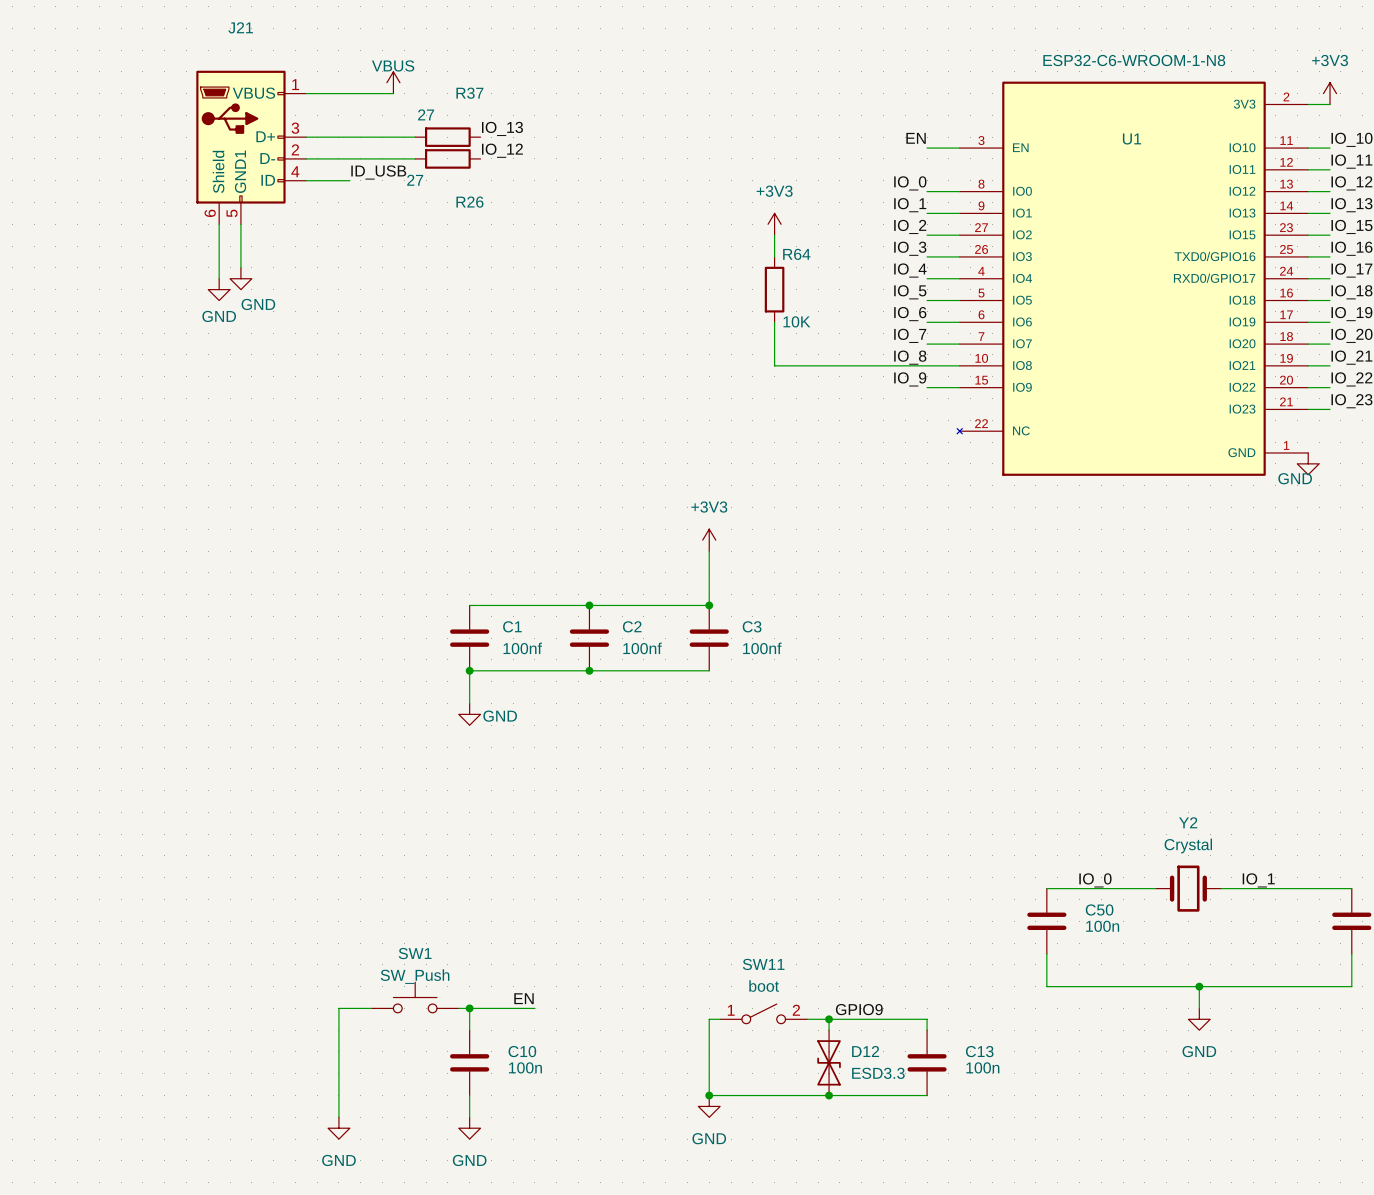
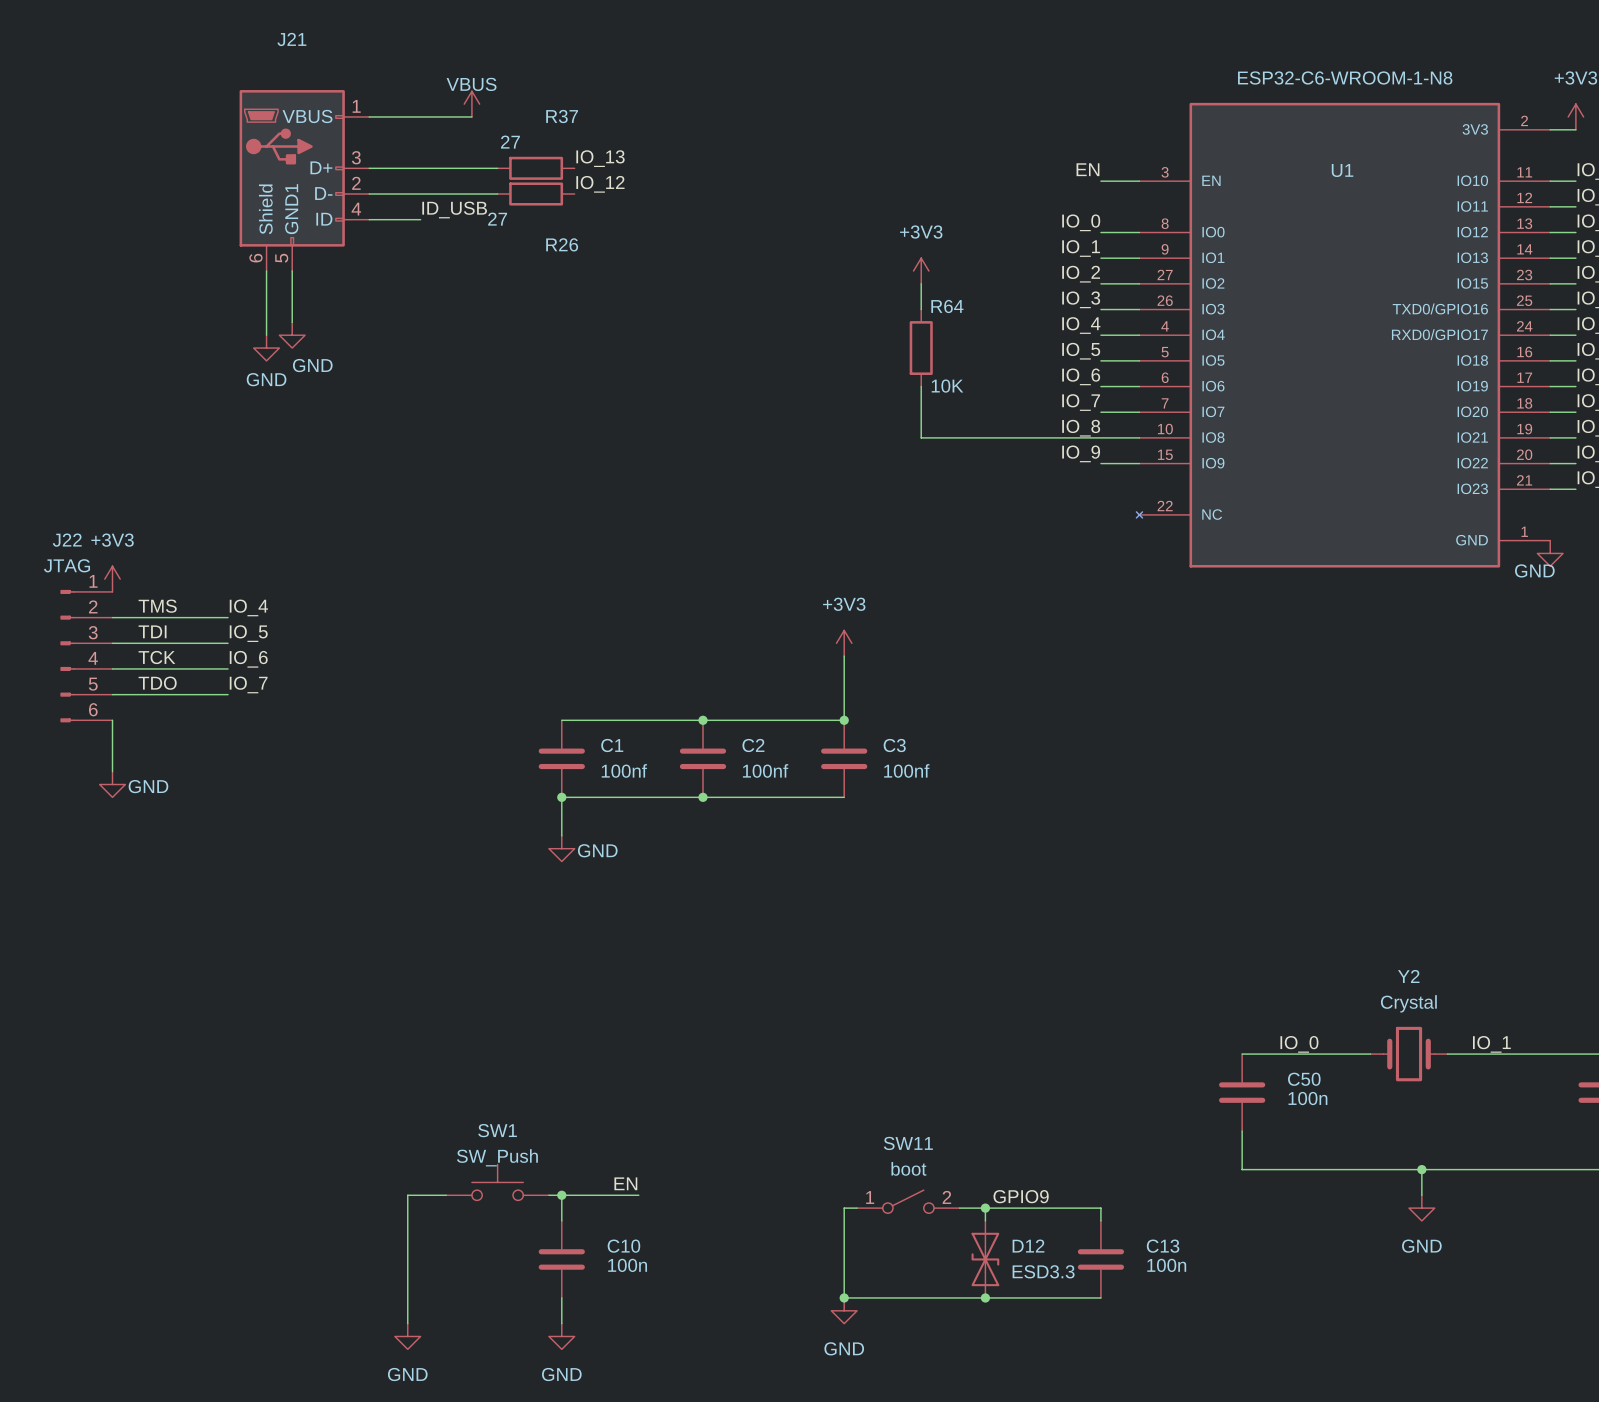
power symbol: none -> +3V3 (112, 579)
label: none -> TMS (157, 606)
label: none -> IO_4 (248, 607)
wire: none -> (112, 617) (228, 617)
label: none -> TDI (152, 631)
label: none -> IO_5 (248, 633)
wire: none -> (112, 643) (228, 643)
J22: none -> JTAG (86, 656)
label: none -> TCK (156, 657)
label: none -> IO_6 (248, 659)
wire: none -> (112, 668) (228, 668)
label: none -> TDO (157, 683)
label: none -> IO_7 (248, 684)
wire: none -> (112, 694) (228, 694)
wire: none -> (112, 720) (112, 771)
power symbol: none -> GND (112, 784)

